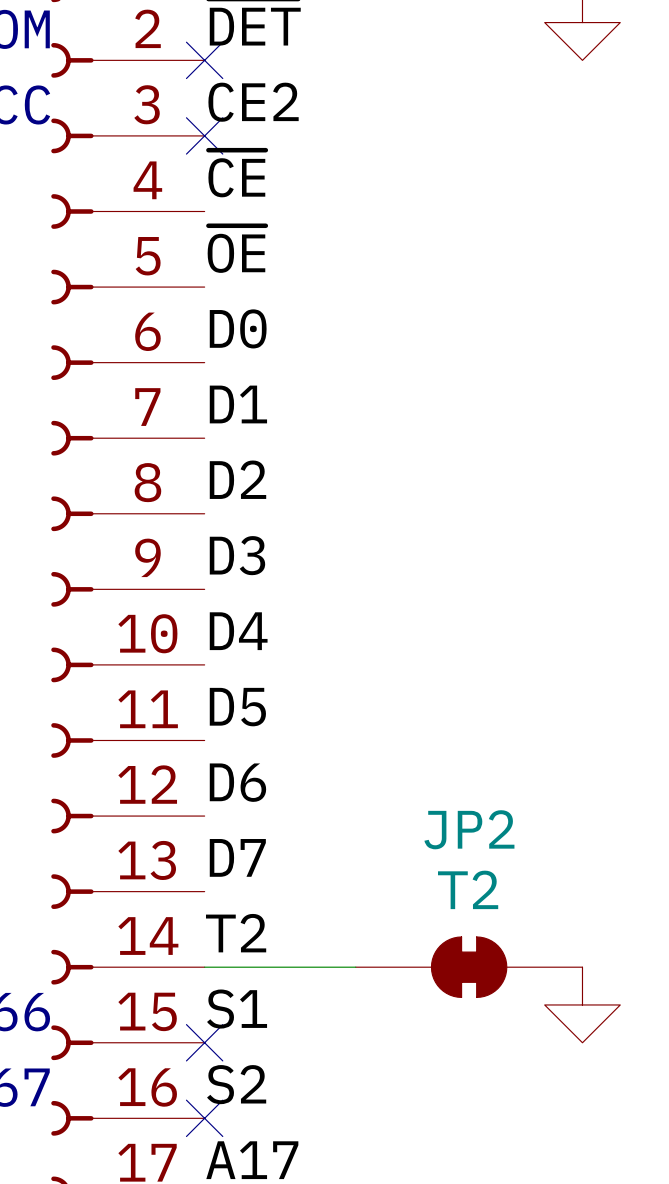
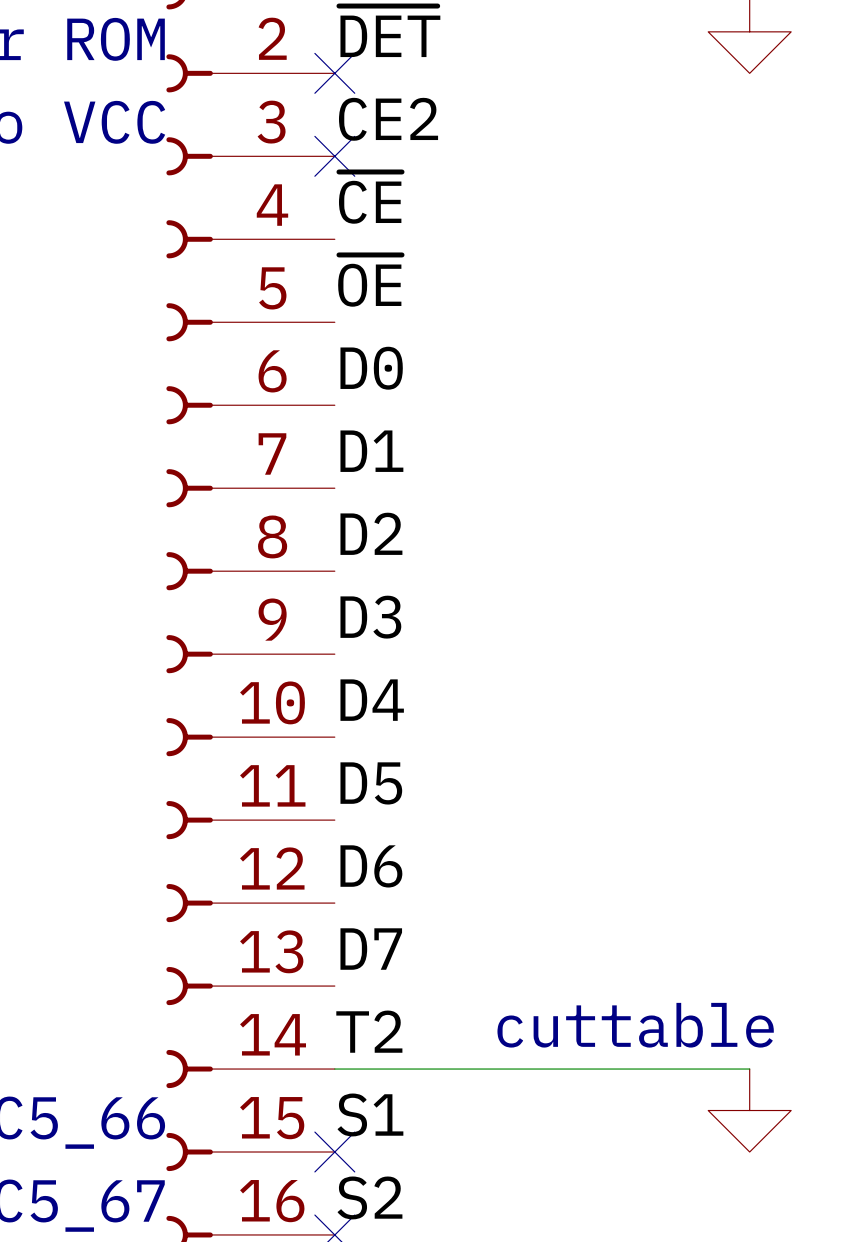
text: none -> cuttable (635, 1025)
JP2: T2 (469, 967) -> none

